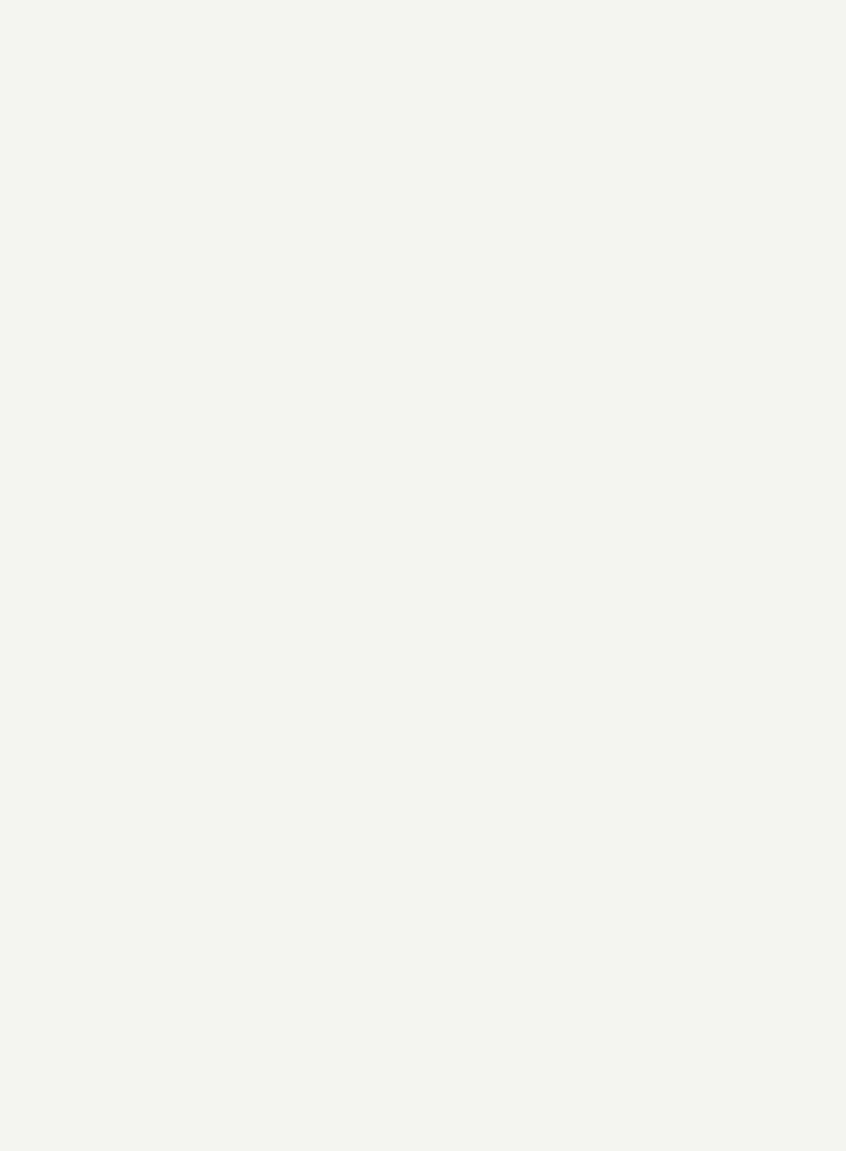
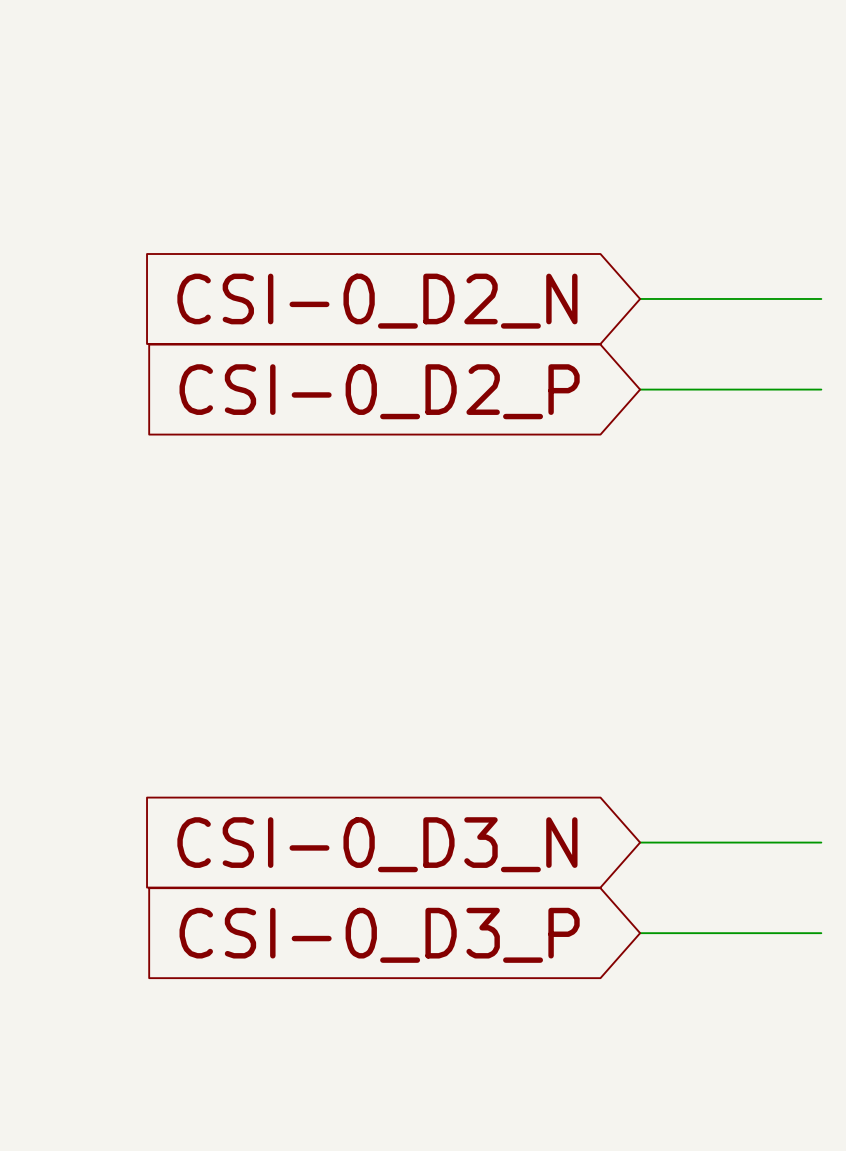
wire: none -> (640, 298) (821, 298)
global label: none -> CSI-0_D2_N (377, 301)
wire: none -> (640, 389) (821, 389)
global label: none -> CSI-0_D2_P (379, 391)
wire: none -> (640, 842) (821, 842)
global label: none -> CSI-0_D3_N (377, 844)
wire: none -> (640, 933) (821, 933)
global label: none -> CSI-0_D3_P (379, 935)

